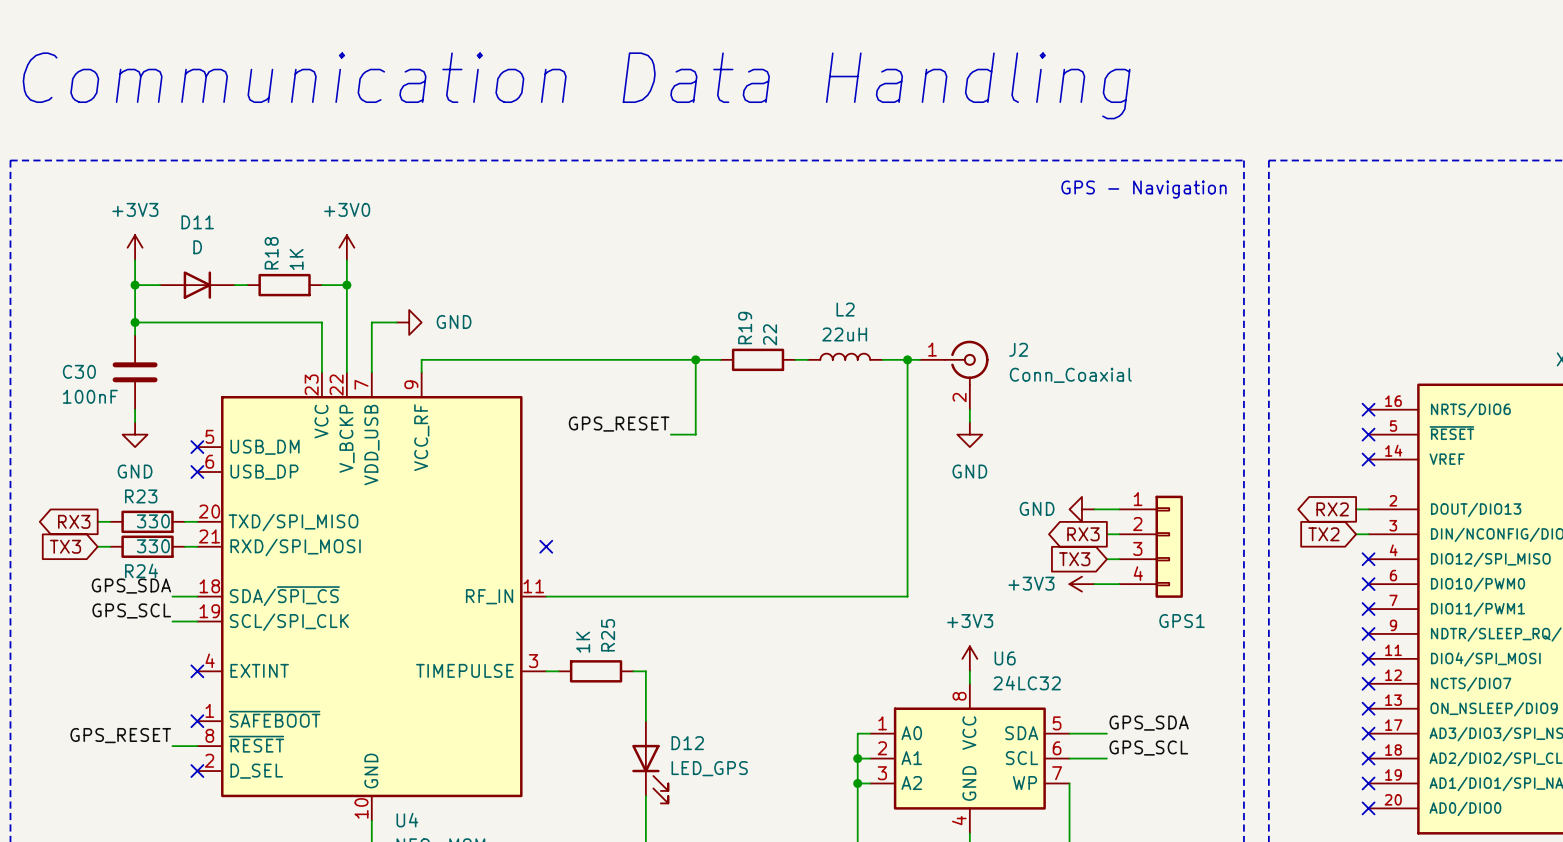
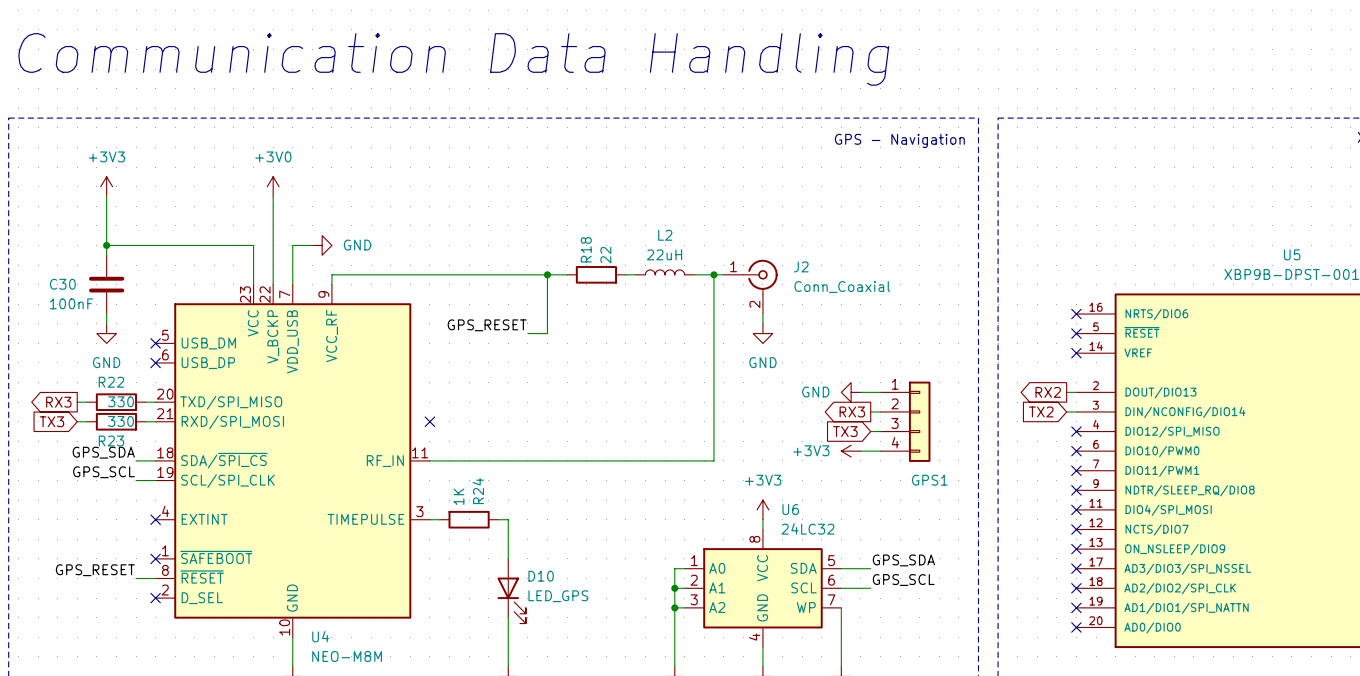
wire: (135, 285) (159, 285) -> none
junction: (135, 285) -> none
D11: D (197, 285) -> none
wire: (234, 285) (247, 285) -> none
R18: 1K (284, 285) -> none
wire: (321, 285) (346, 285) -> none
junction: (346, 285) -> none
R19 name: R19 (745, 328) -> R18 (586, 249)
R23 name: R23 (141, 496) -> R22 (111, 382)
R24 name: R24 (141, 570) -> R23 (111, 440)
R25 name: R25 (608, 635) -> R24 (478, 491)
D12 name: D12 (687, 743) -> D10 (541, 576)

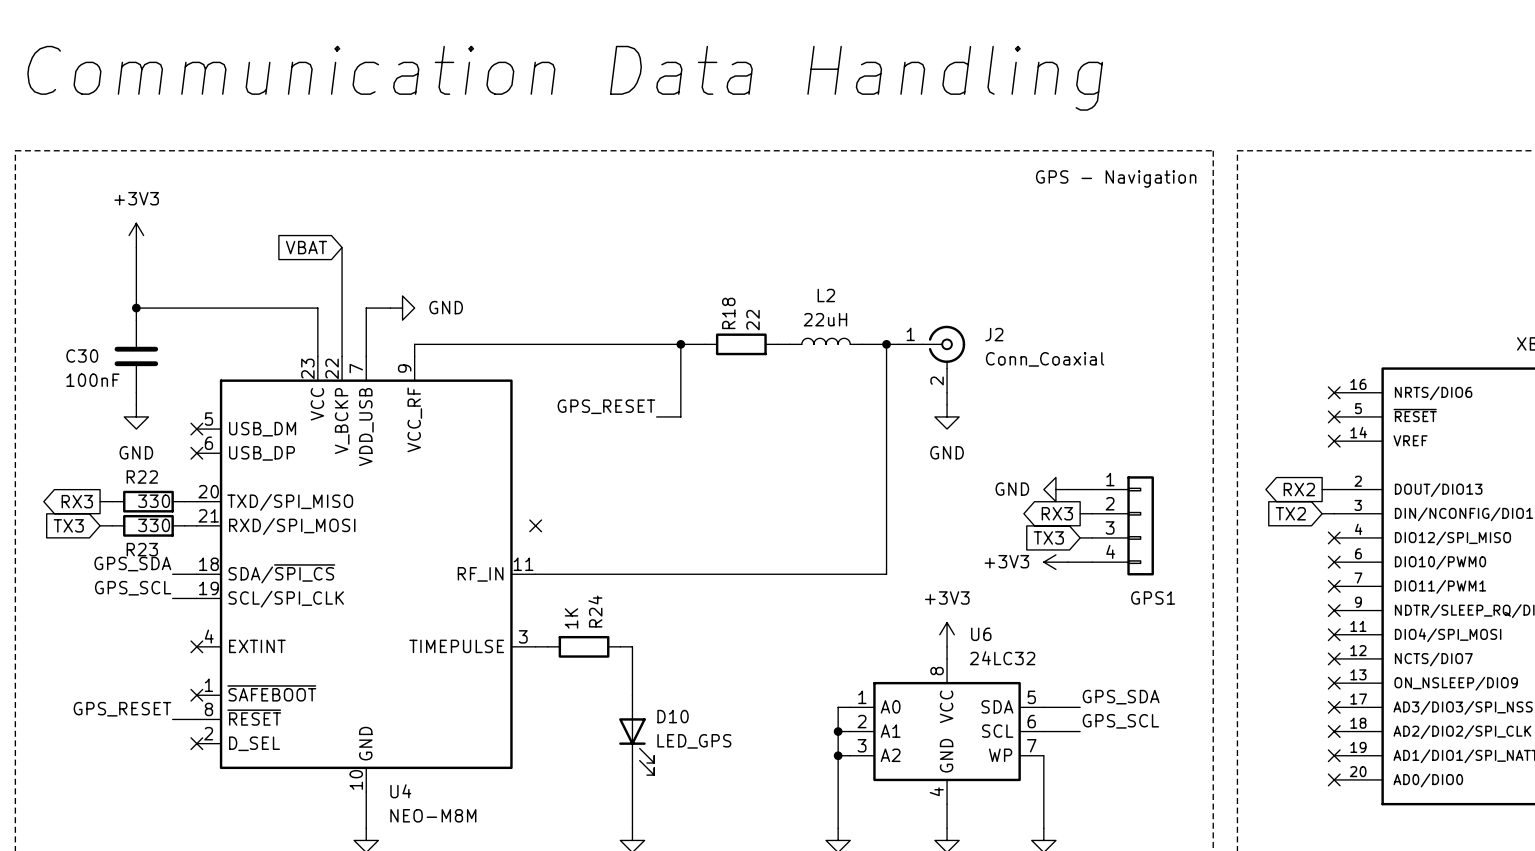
power symbol: +3V0 (273, 186) -> none
global label: none -> VBAT (306, 247)

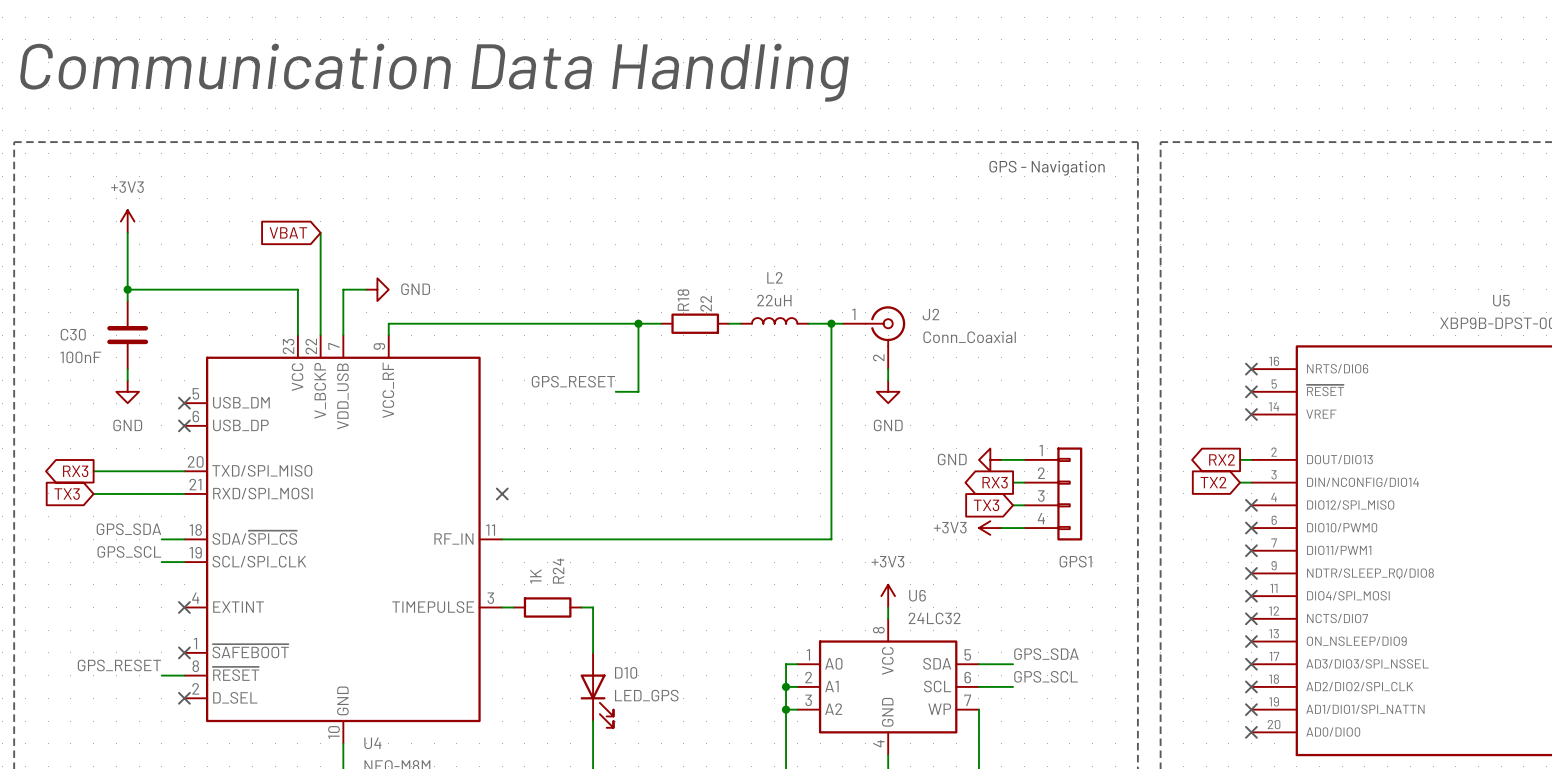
wire: none -> (104, 471) (173, 471)
R22: 330 (148, 501) -> none
wire: none -> (104, 493) (173, 493)
R23: 330 (148, 525) -> none

